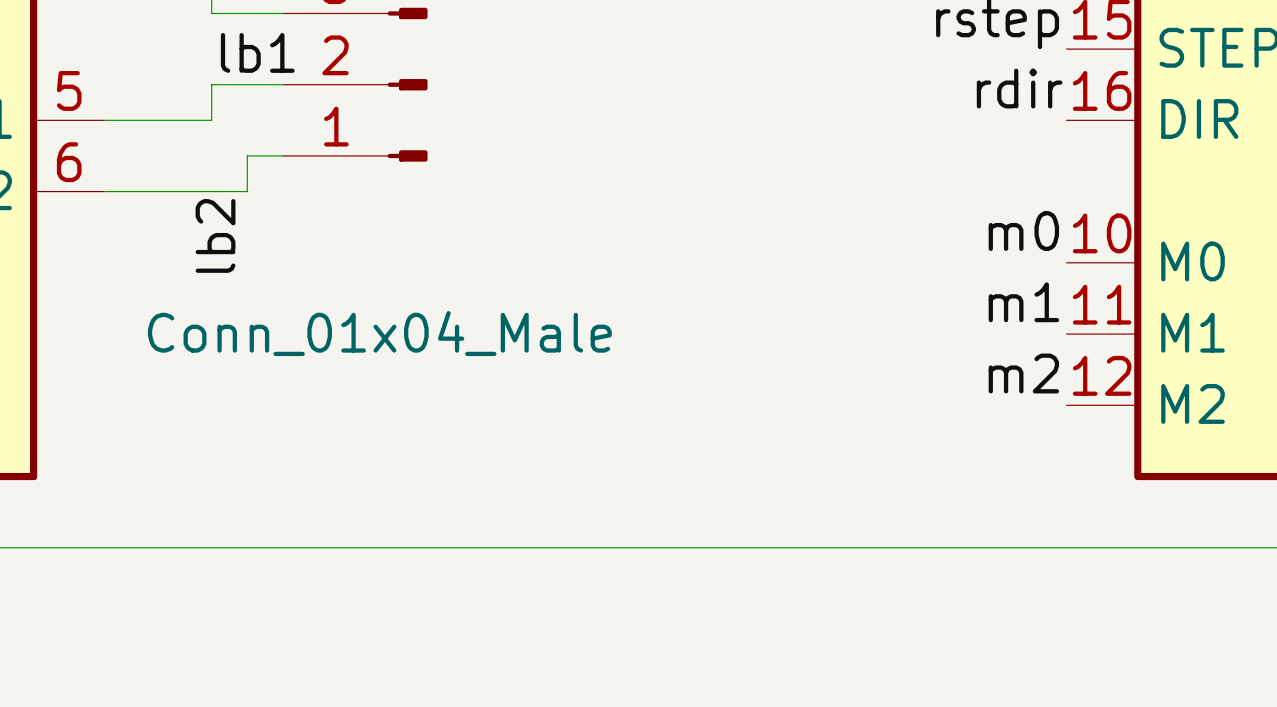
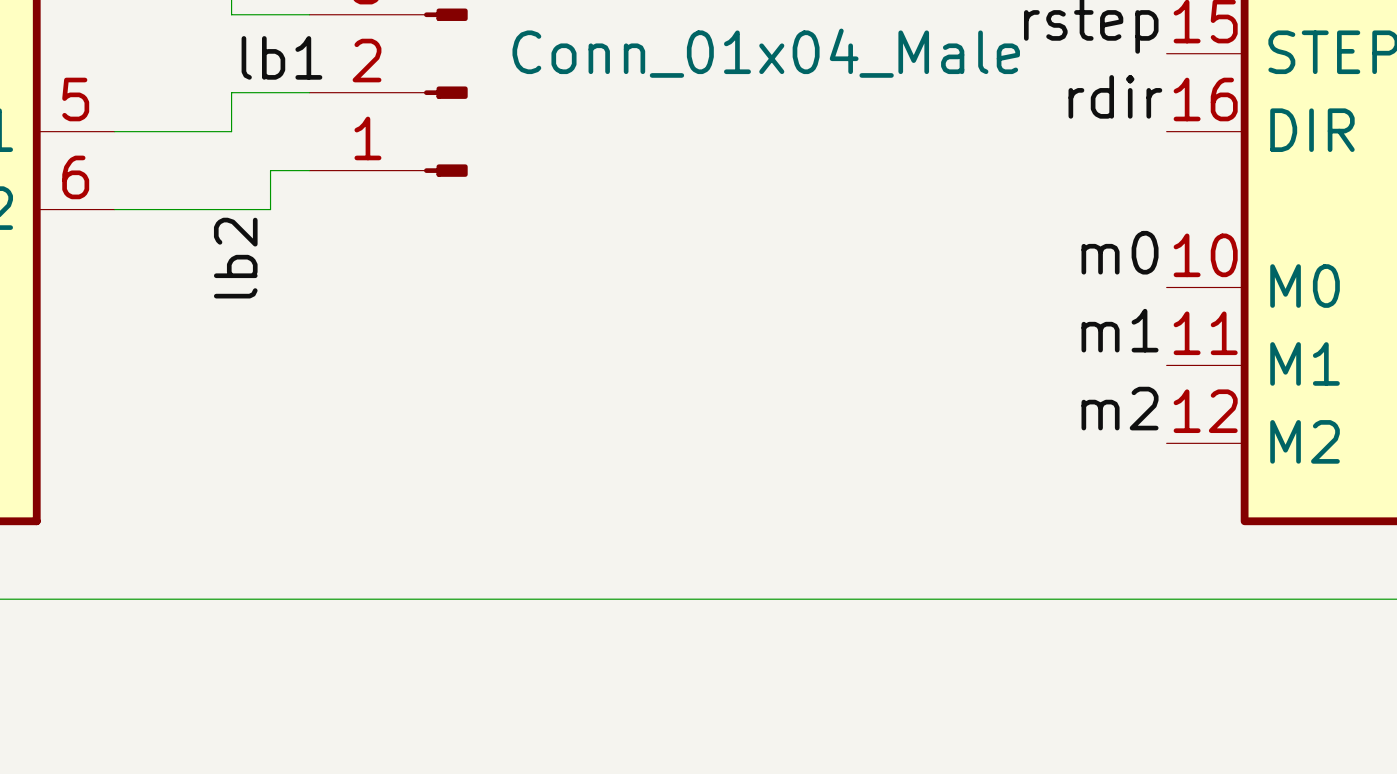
part value position: Conn_01x04_Male (379, 333) -> Conn_01x04_Male (766, 53)

